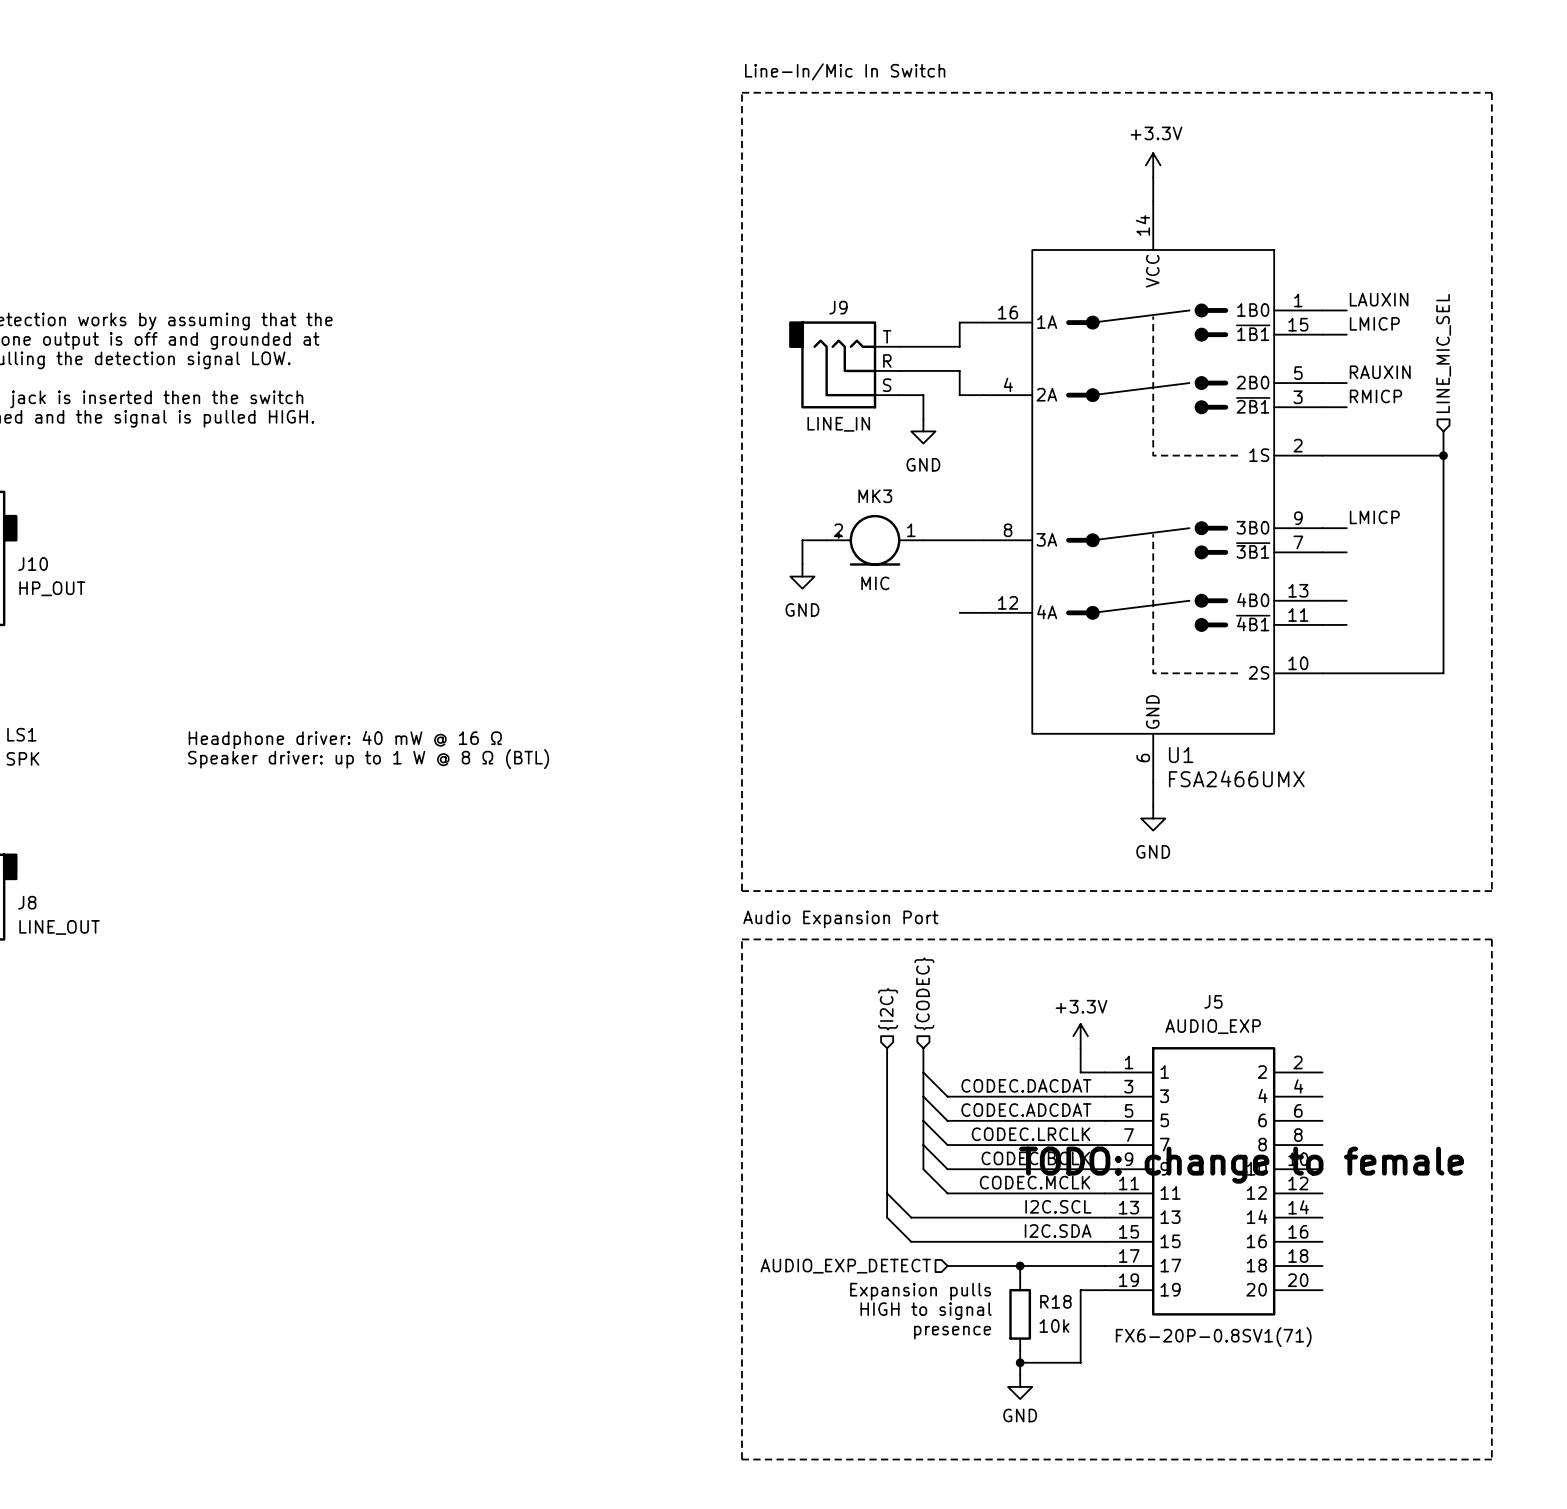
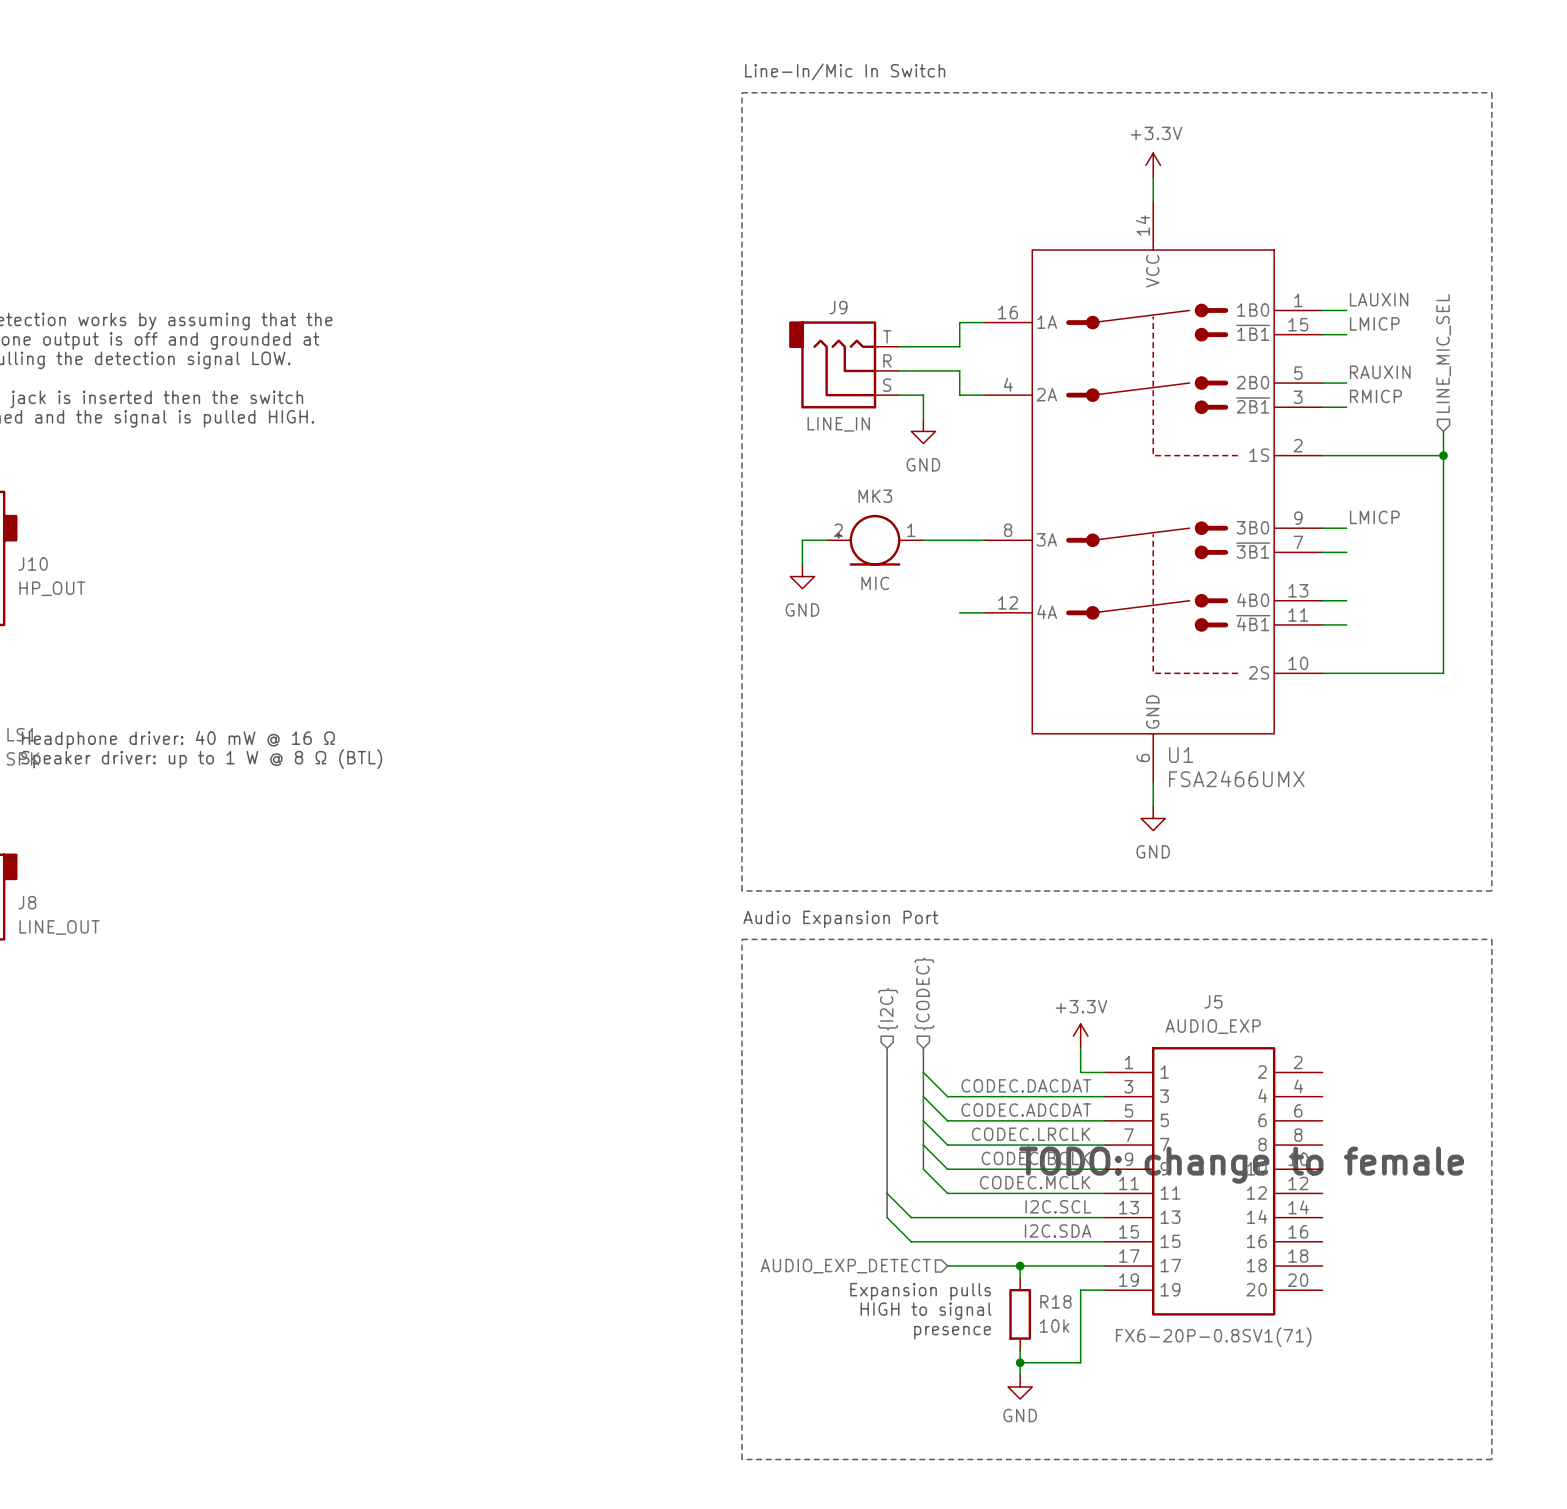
text position: Headphone driver: 40 mW @ 16 Ω (345, 739) -> Headphone driver: 40 mW @ 16 Ω (178, 739)
text position: Speaker driver: up to 1 W @ 8 Ω (BTL) (368, 759) -> Speaker driver: up to 1 W @ 8 Ω (BTL) (201, 759)

